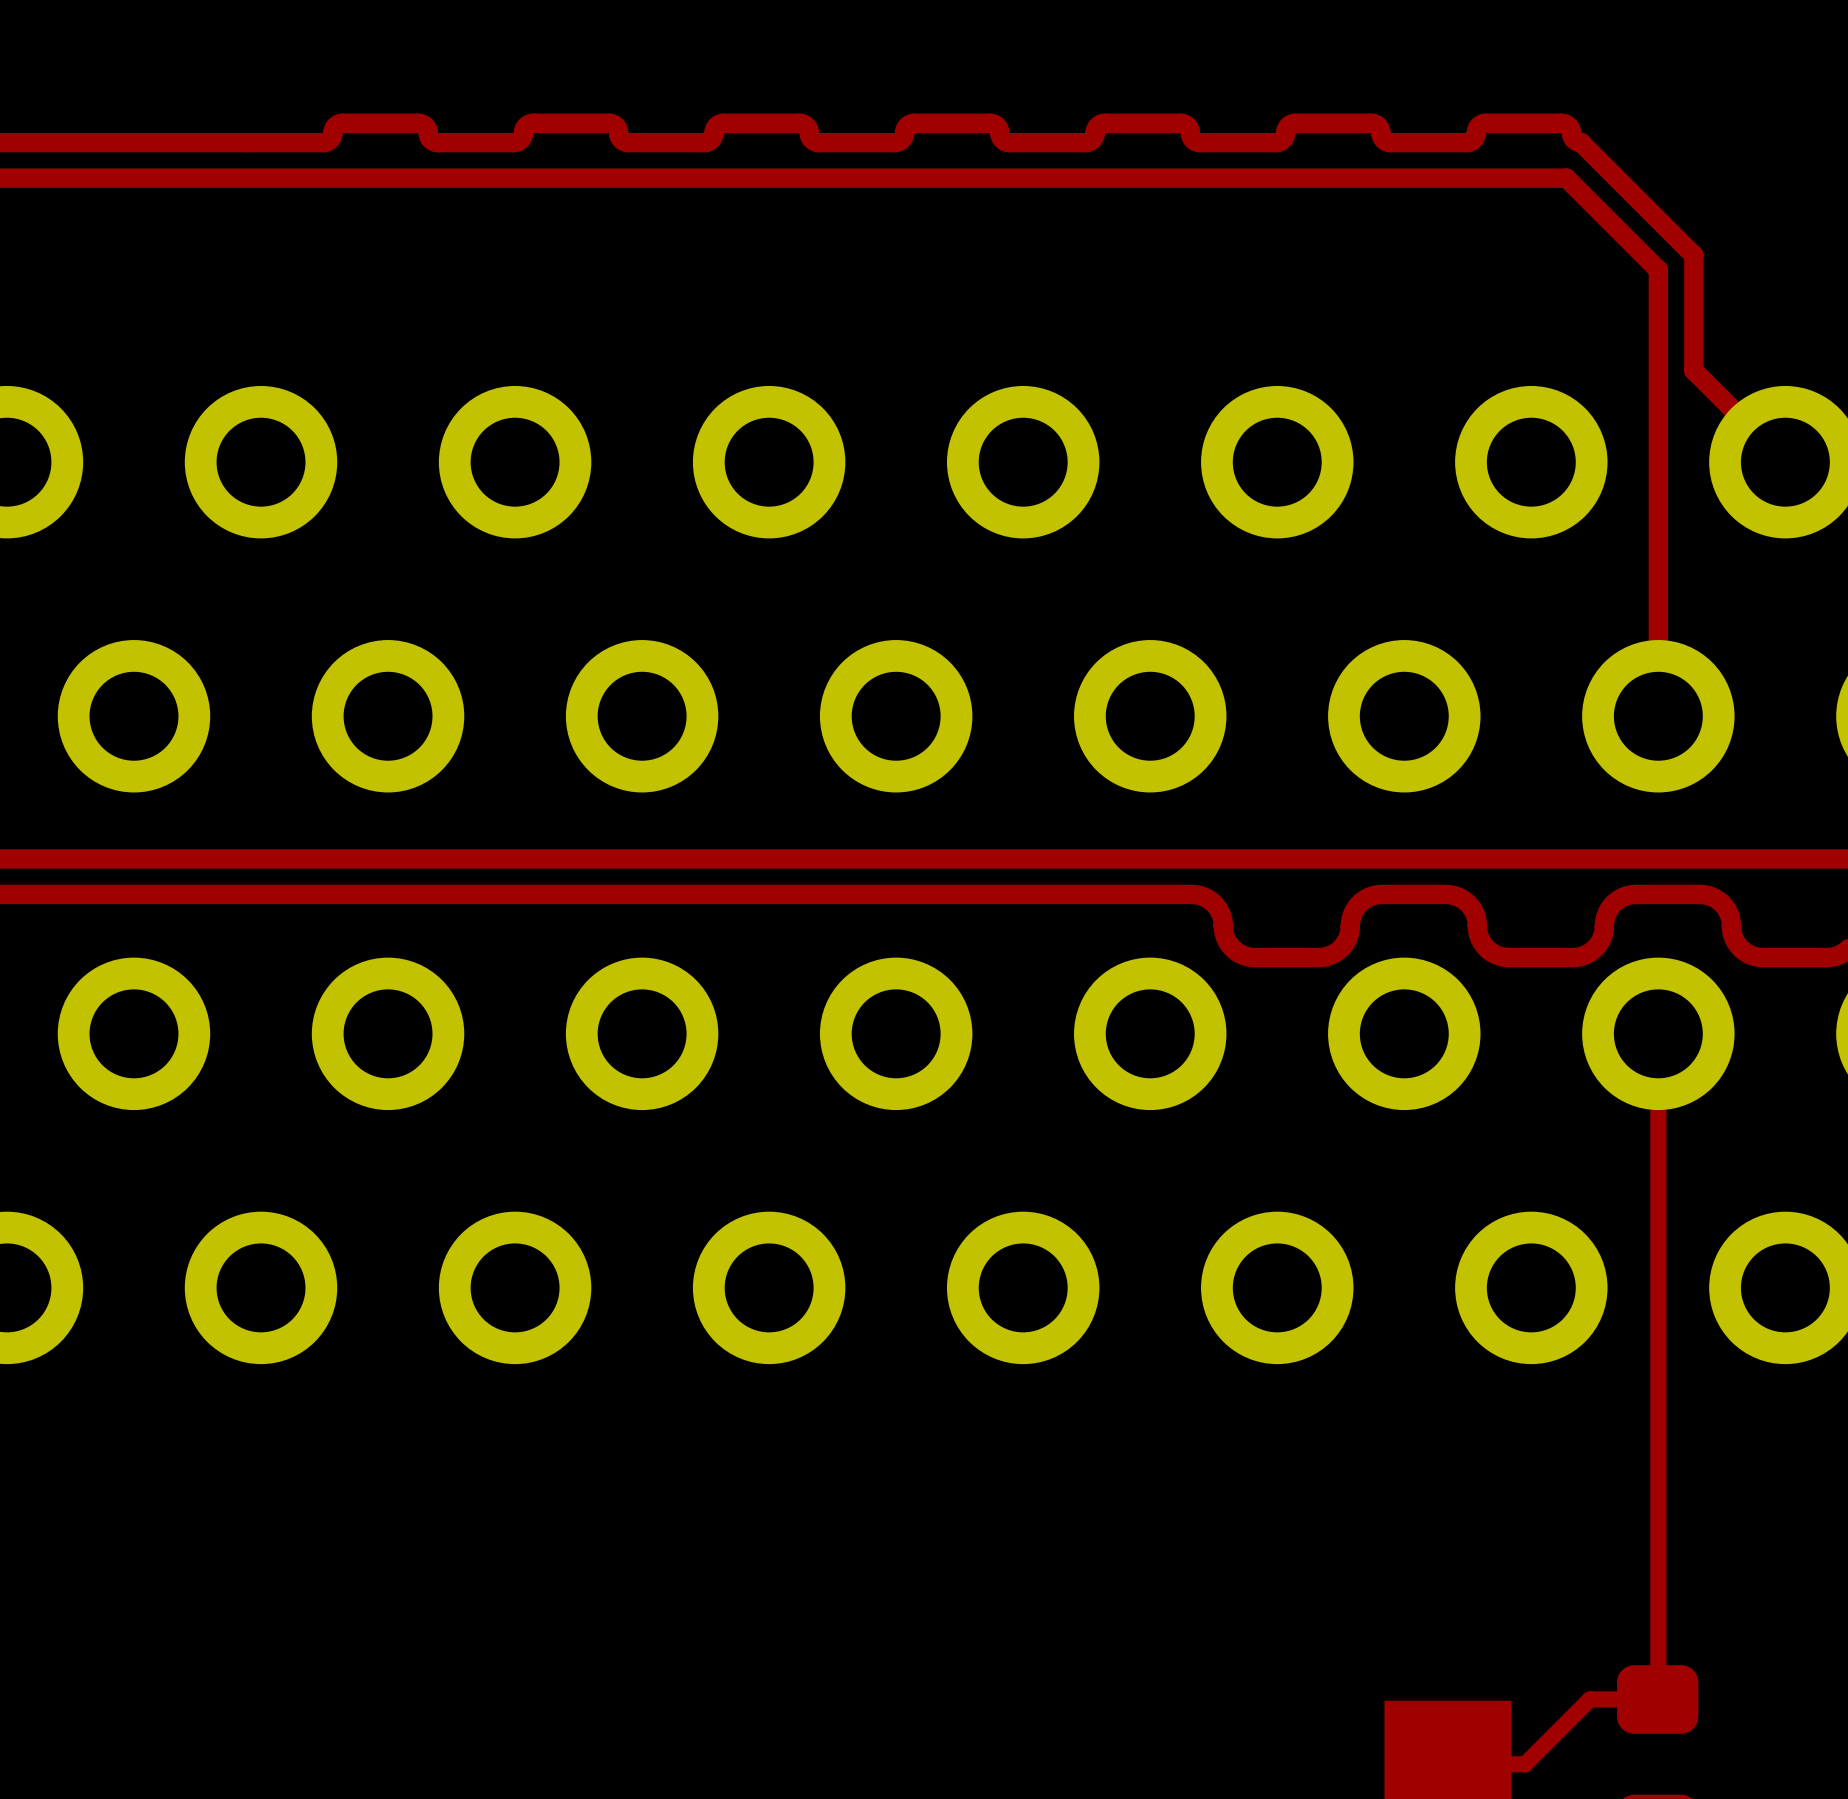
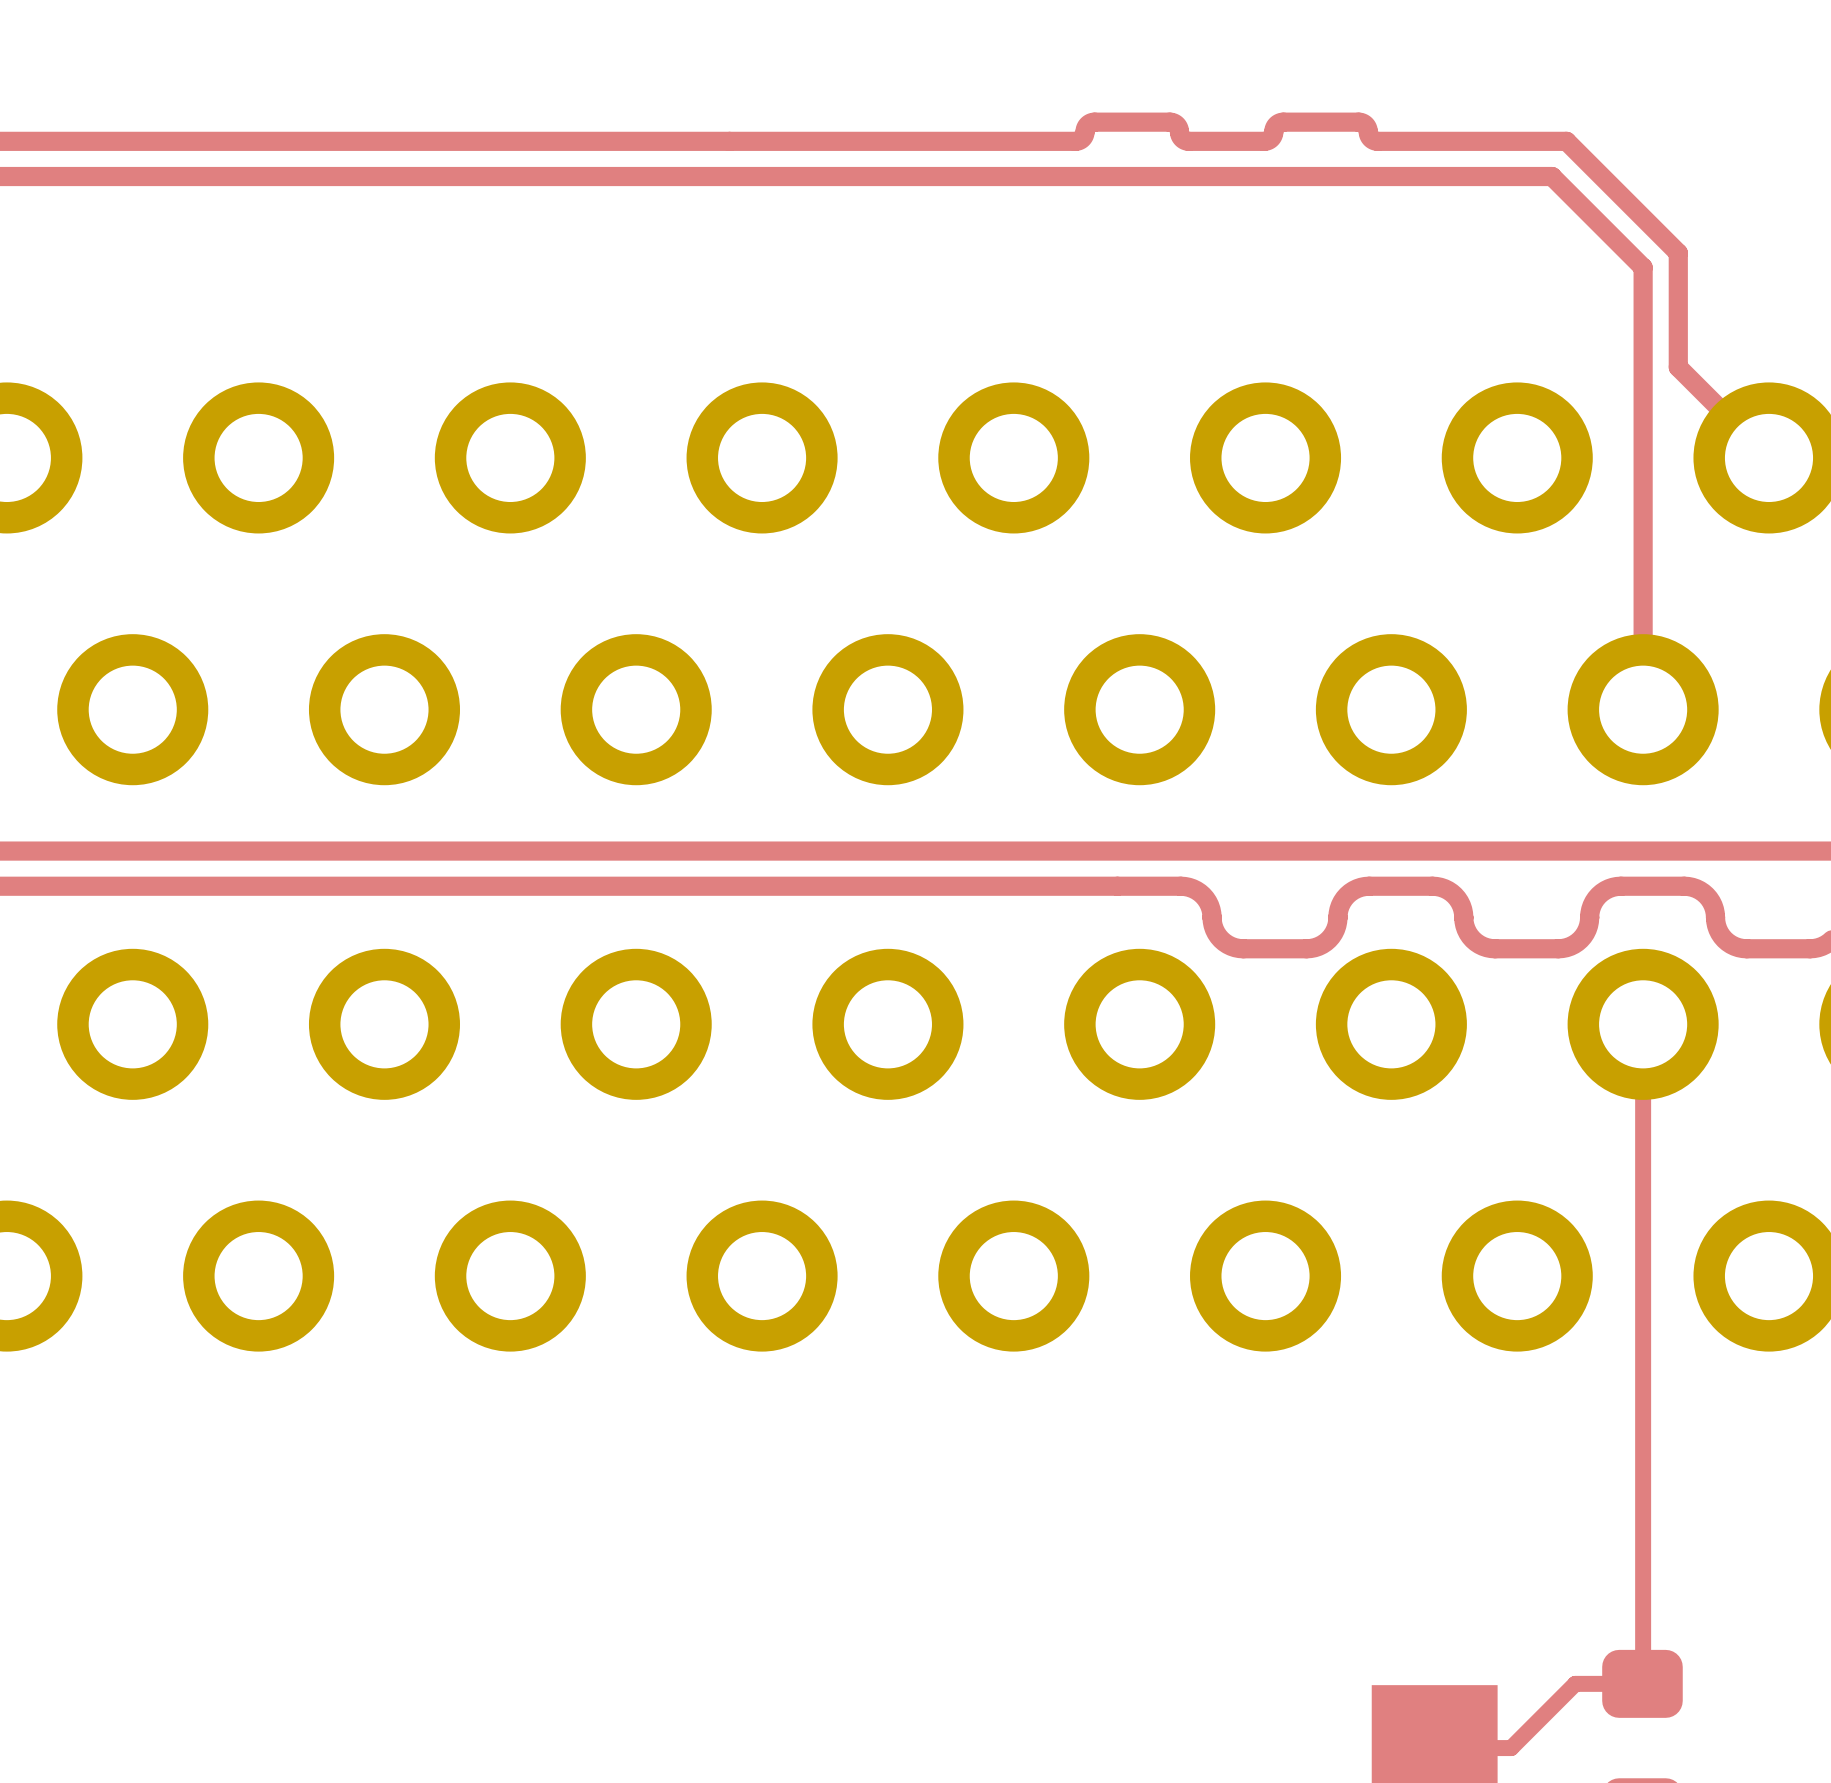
top track: (437, 142) (430, 139) (425, 126) (418, 123) (340, 123) (334, 127) (330, 139) (323, 142) -> (433, 141) (320, 141)
top track: (628, 142) (621, 139) (616, 126) (609, 123) (530, 123) (524, 127) (520, 139) (513, 142) -> (622, 141) (509, 141)
top track: (818, 142) (812, 139) (807, 126) (799, 123) (721, 123) (715, 127) (711, 139) (704, 142) -> (811, 141) (697, 141)
top track: (1009, 142) (1002, 139) (997, 126) (990, 123) (912, 123) (906, 127) (901, 139) (894, 142) -> (1000, 141) (886, 141)
top track: (1581, 142) (1574, 139) (1569, 126) (1561, 123) (1483, 123) (1477, 127) (1473, 139) (1466, 142) -> (1566, 141) (1453, 141)

